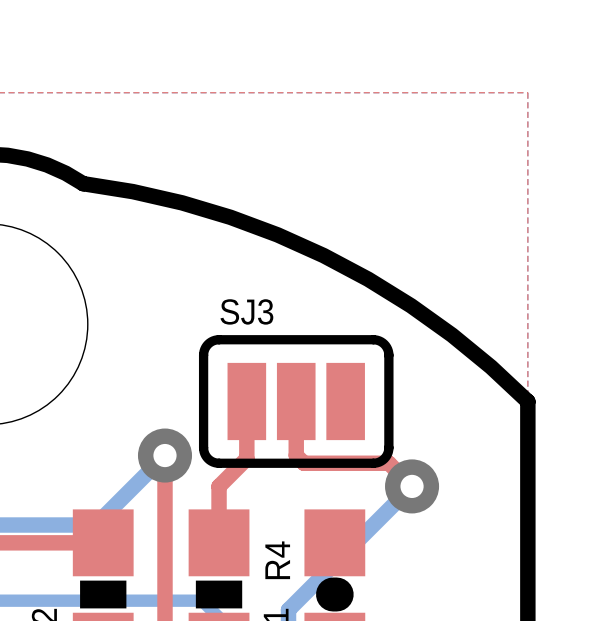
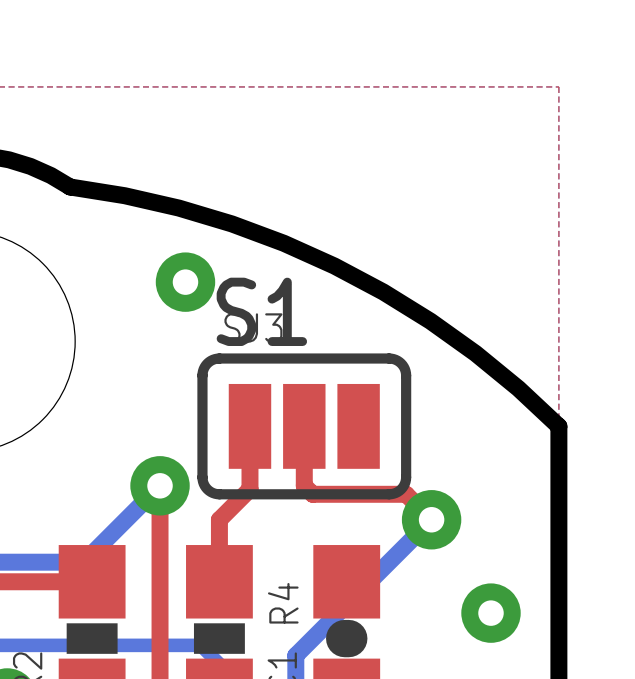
via: none -> (185, 282)
text: none -> S1 (261, 311)
via: none -> (491, 613)

